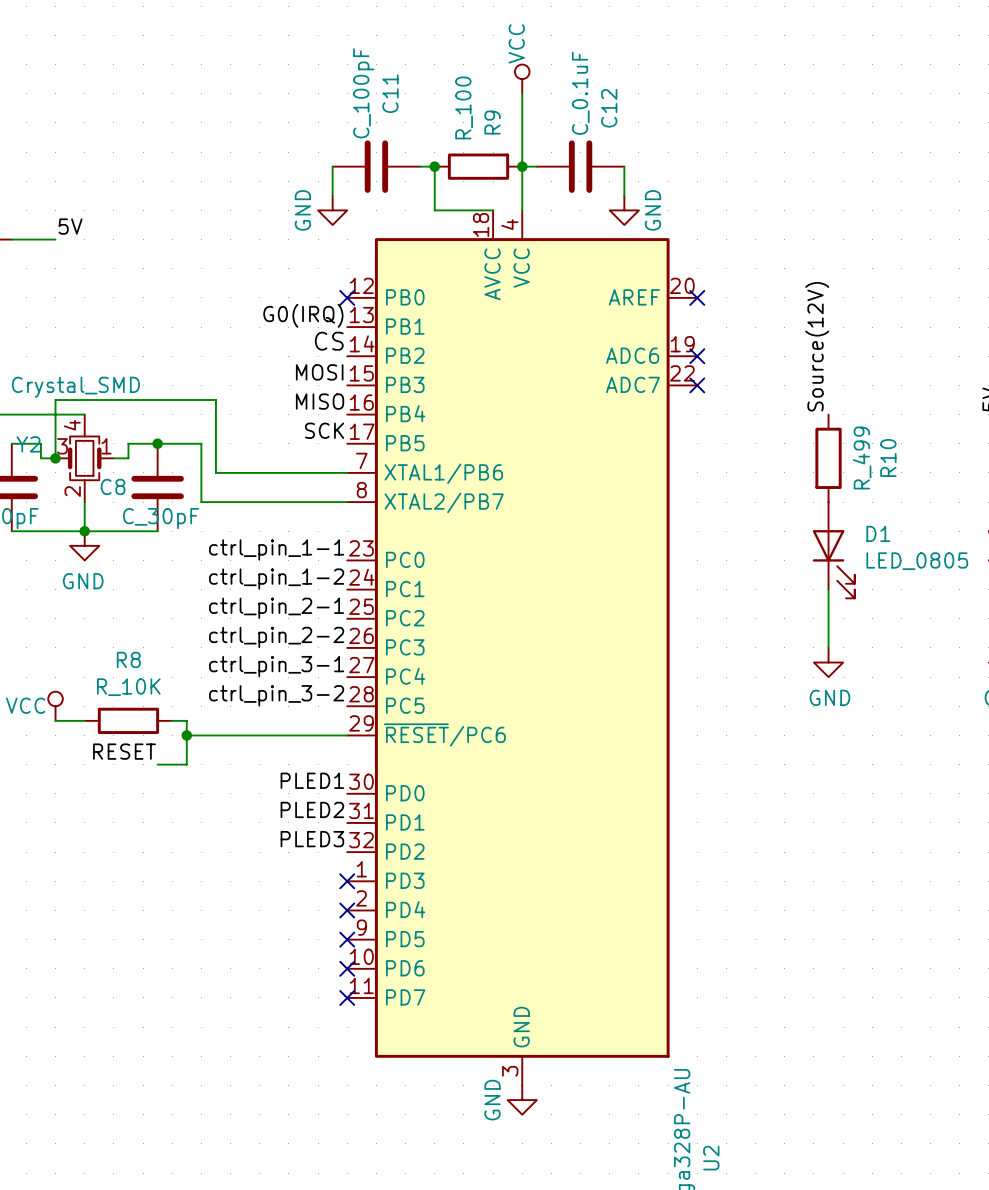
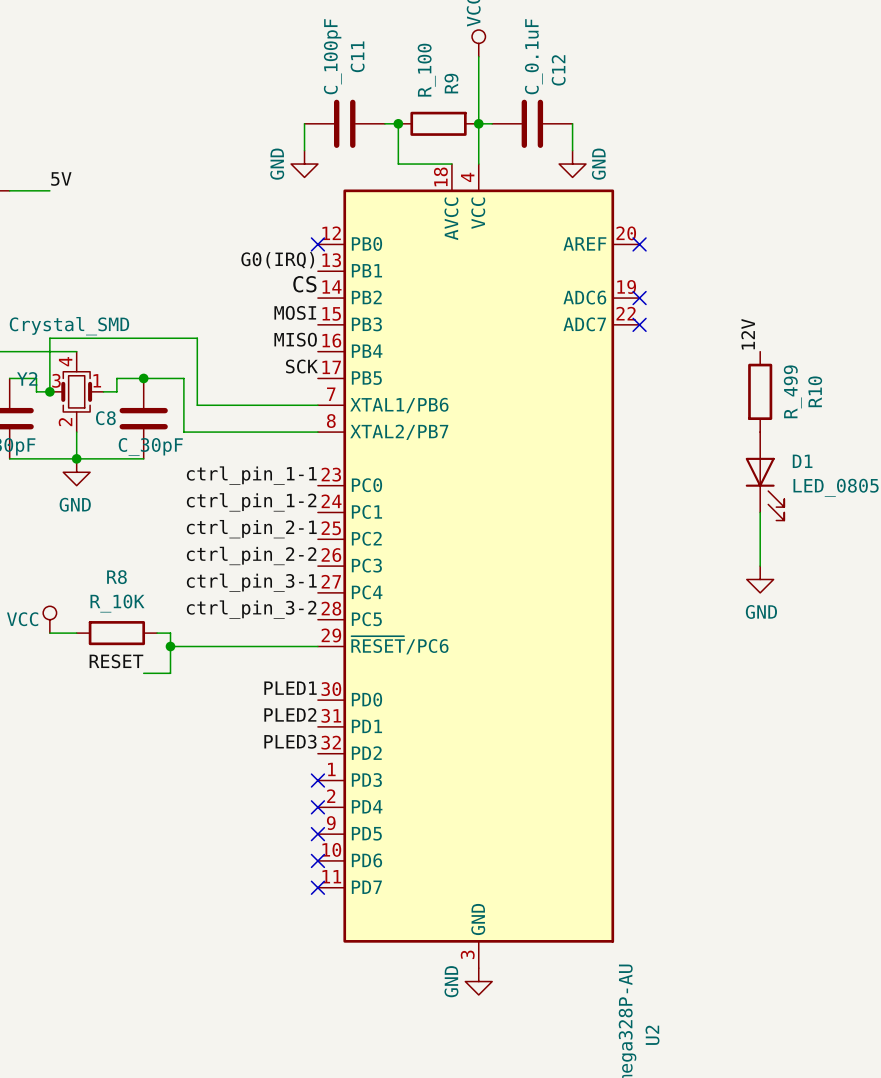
label: Source(12V) (817, 346) -> 12V (748, 334)

